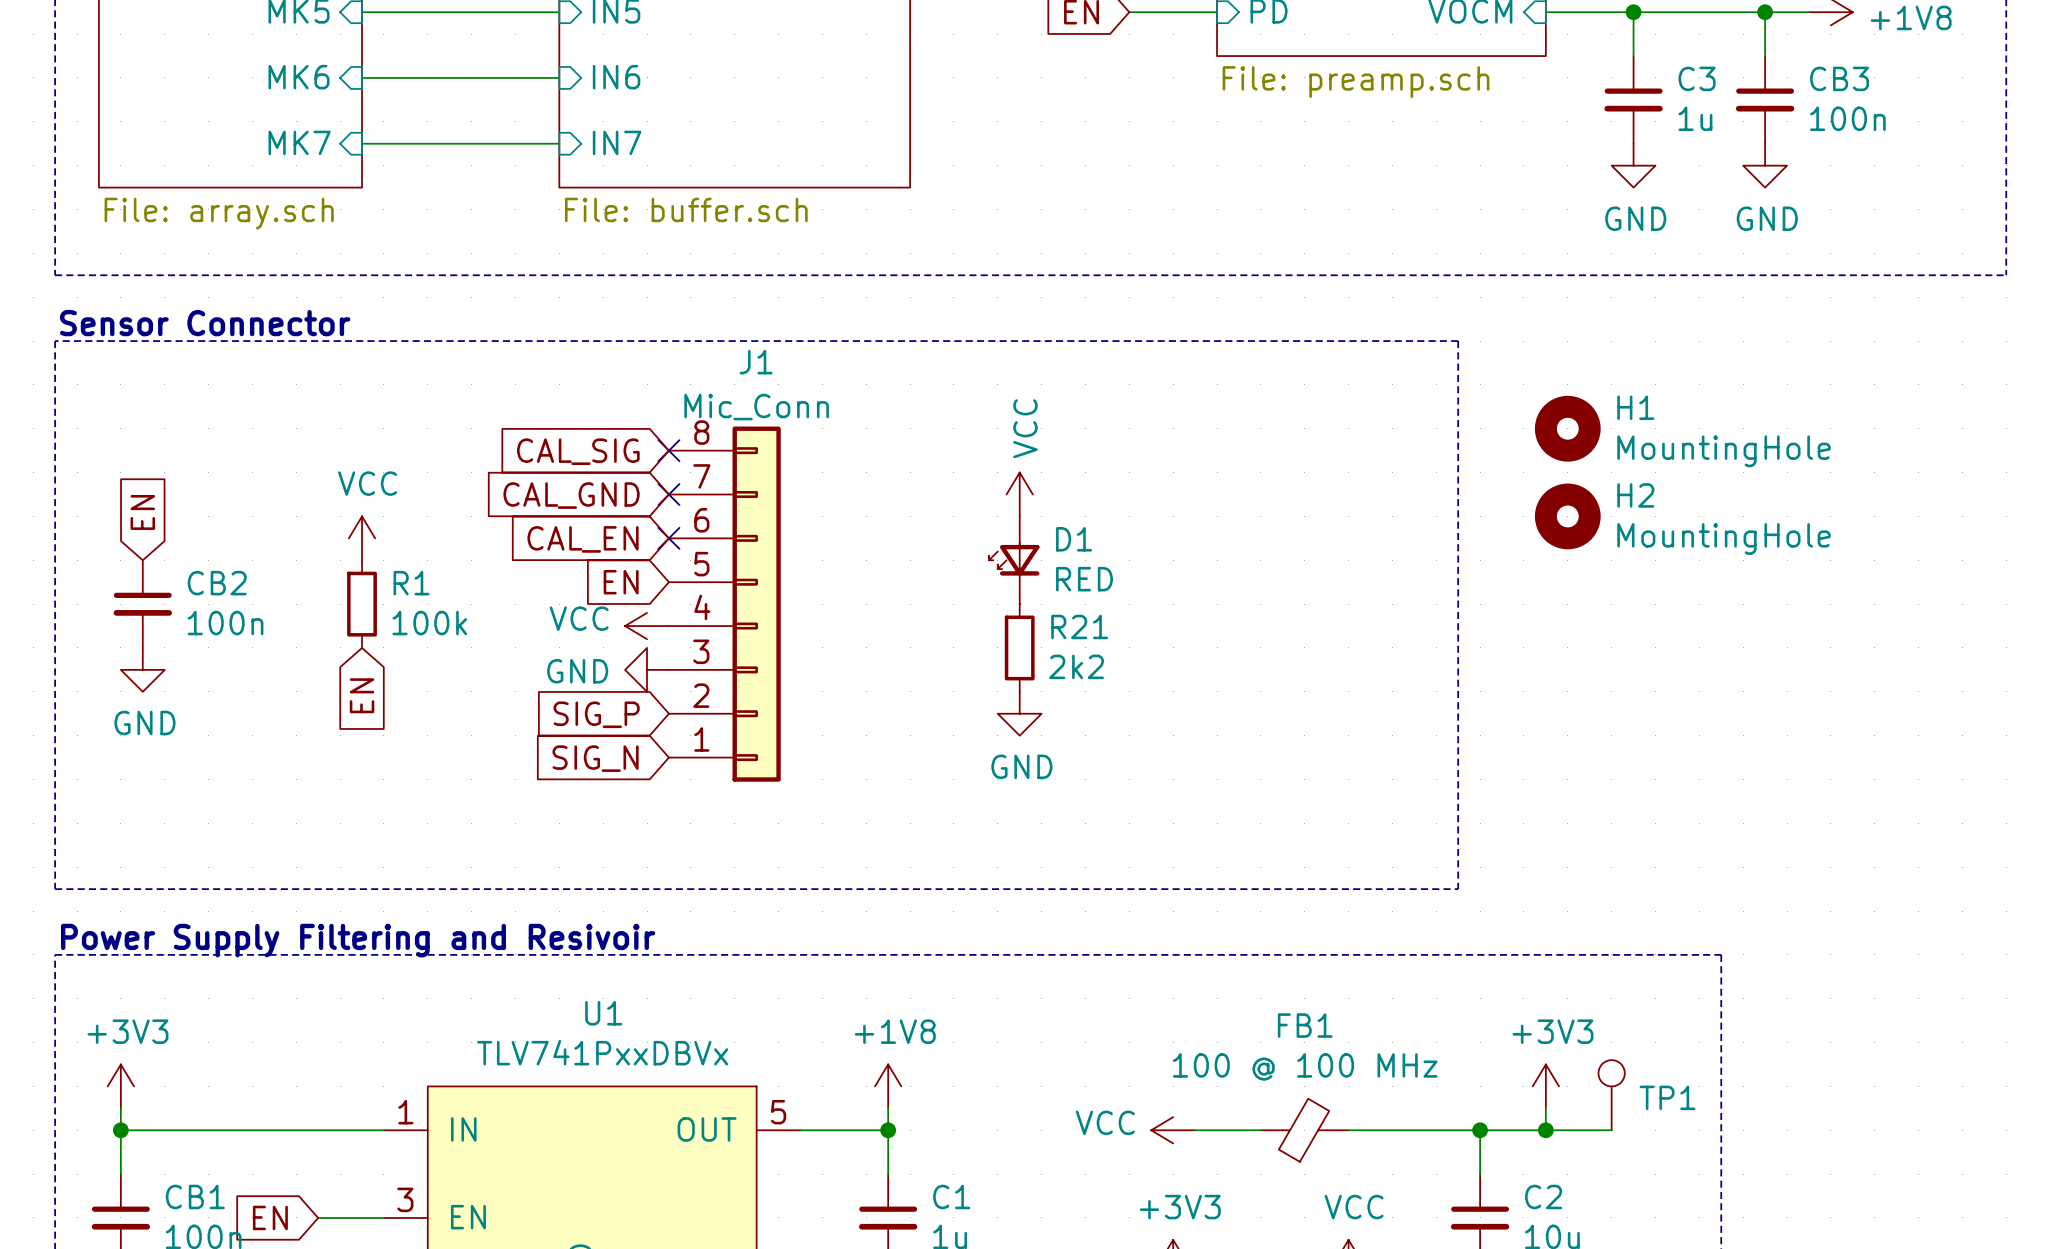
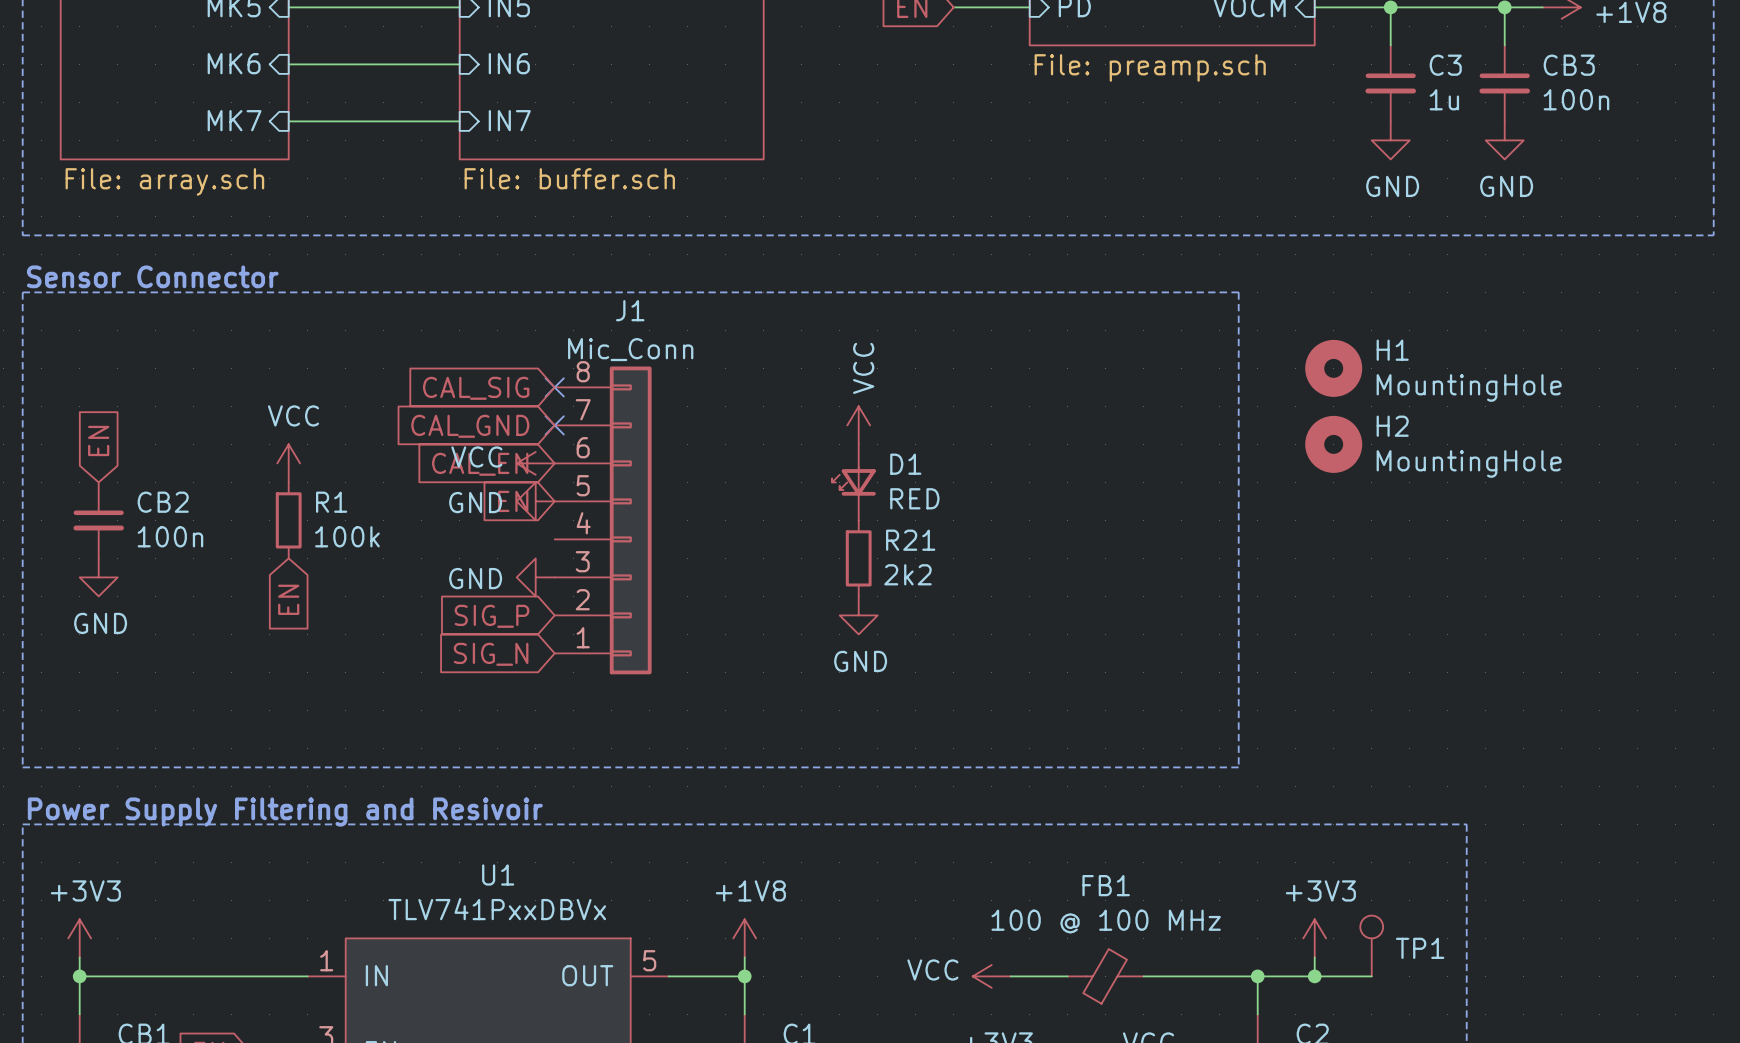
no-connect mark: (668, 538) -> none
power symbol: none -> GND (535, 501)
power symbol position: VCC (647, 626) -> VCC (535, 463)

